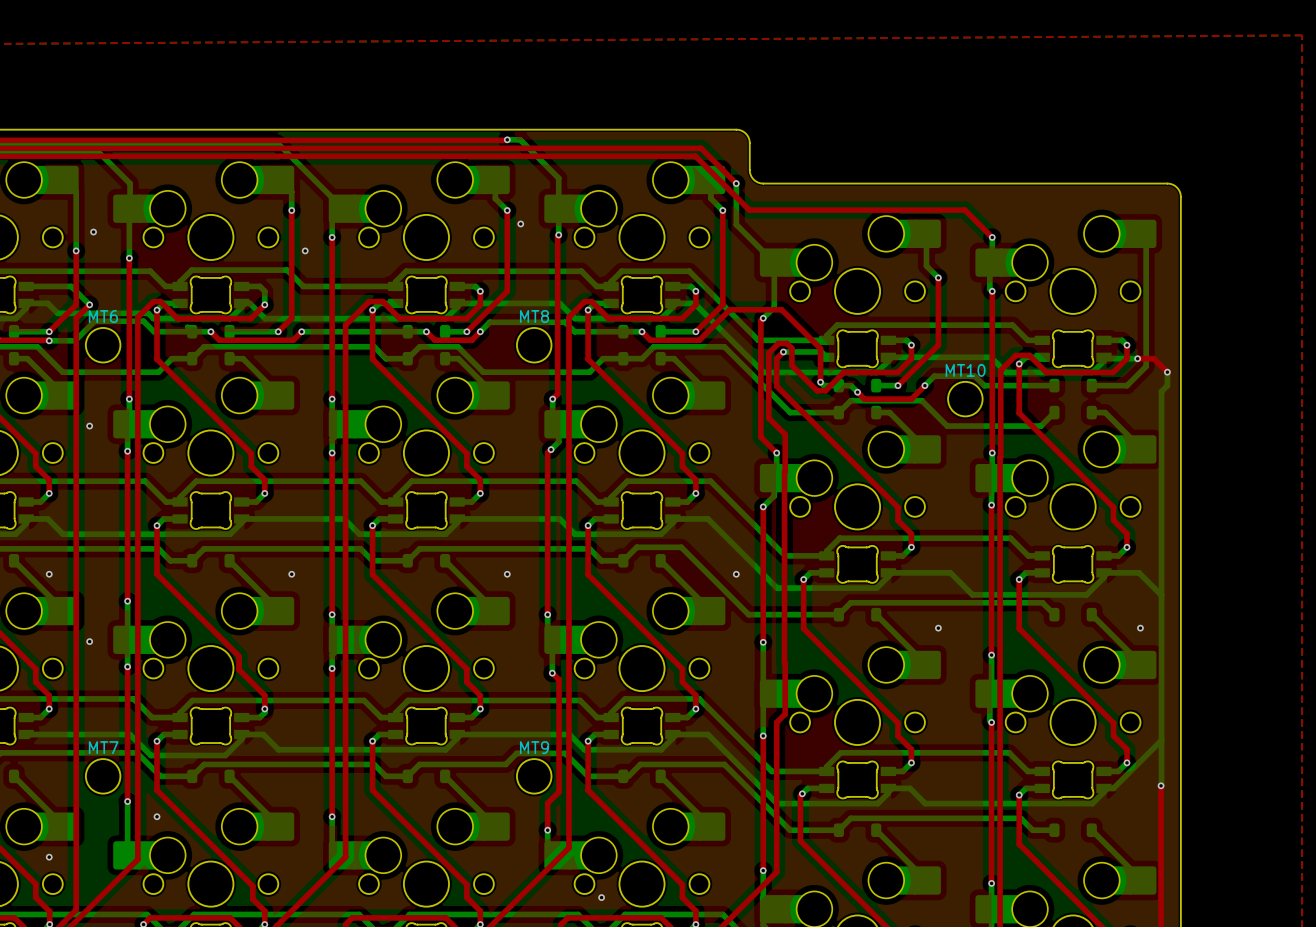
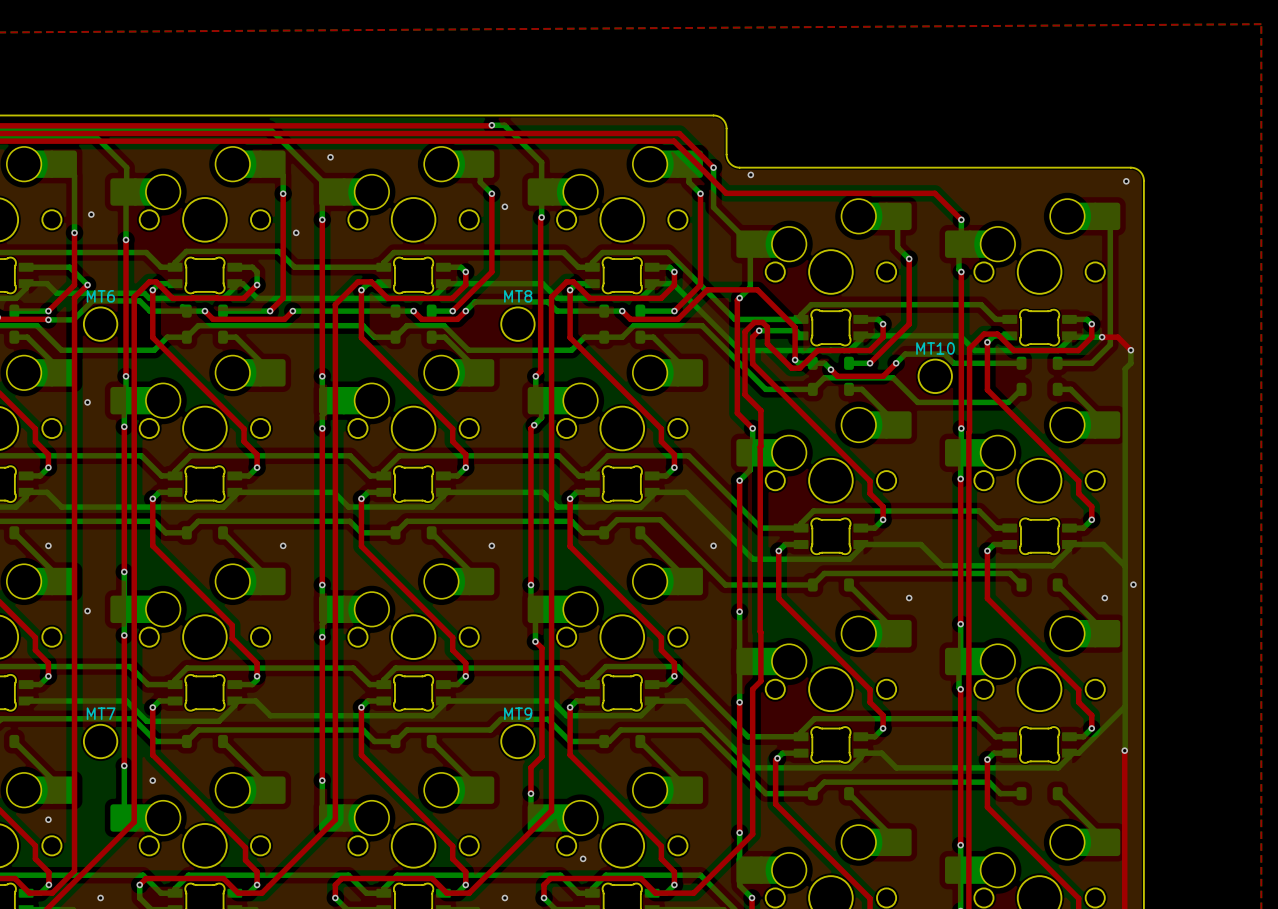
via: none -> (330, 157)
via: none -> (750, 174)
via: none -> (1126, 181)
via: none -> (1133, 584)

